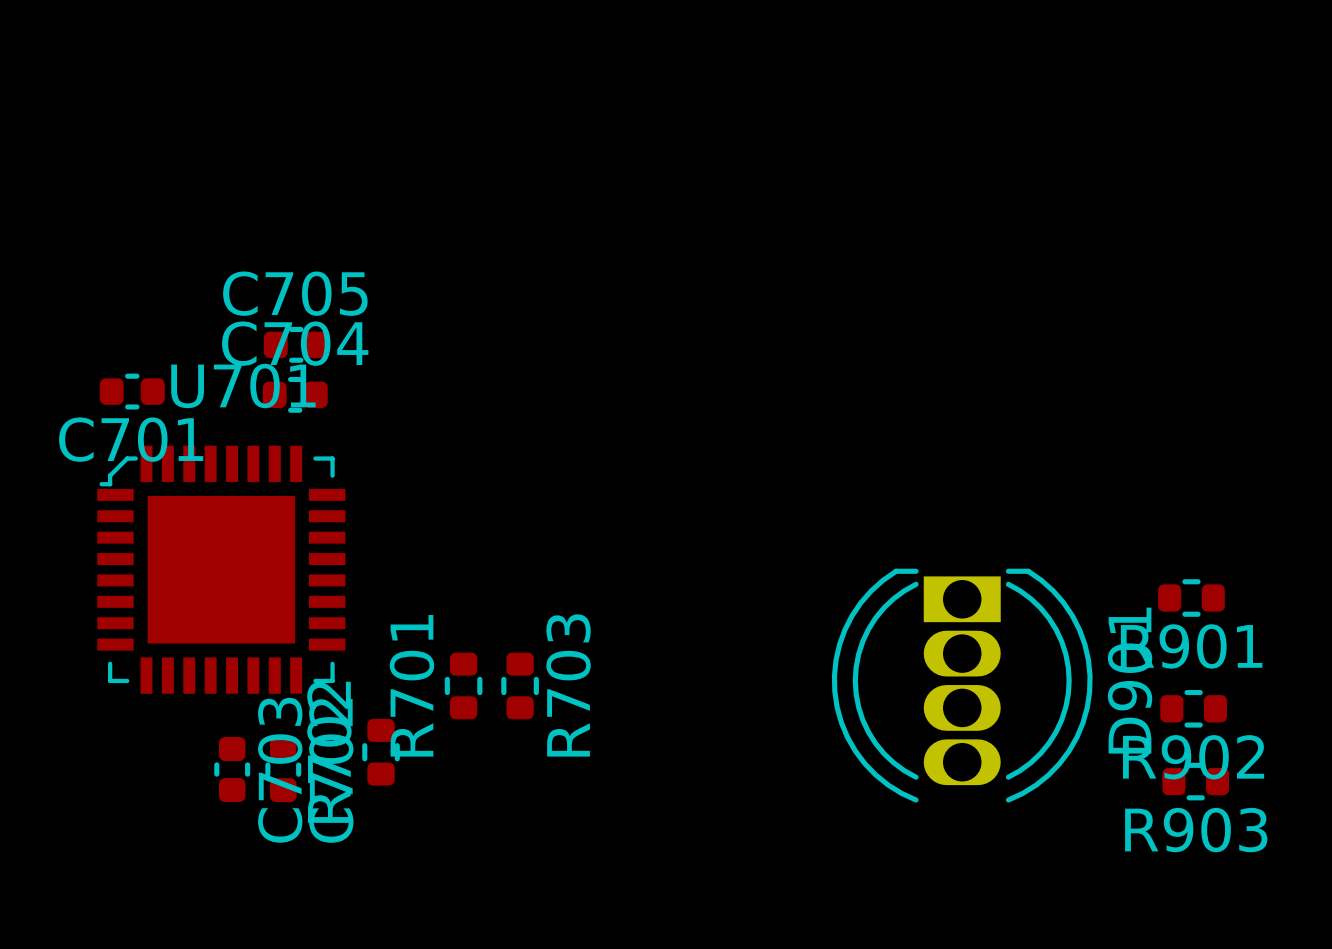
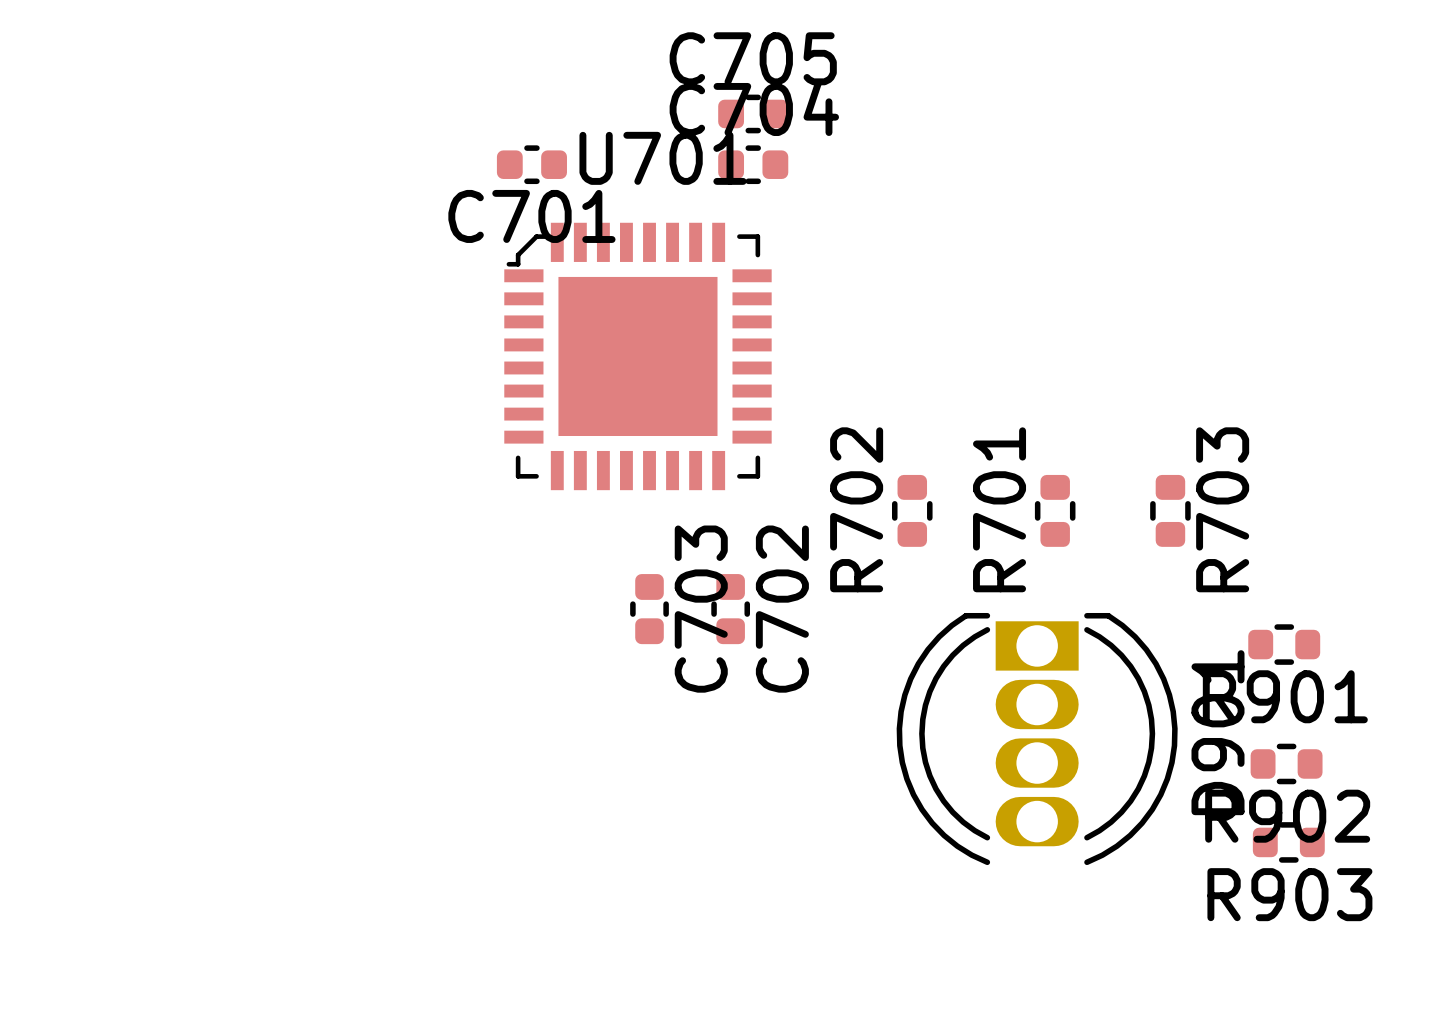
C705 position: (296, 344) -> (753, 113)
C701 position: (132, 391) -> (531, 164)
C704 position: (295, 394) -> (753, 164)
U701 position: (221, 569) -> (637, 356)
R701 position: (463, 685) -> (1055, 510)
R703 position: (520, 685) -> (1170, 510)
R702 position: (381, 752) -> (912, 510)
C703 position: (232, 769) -> (649, 609)
C702 position: (283, 769) -> (730, 609)

